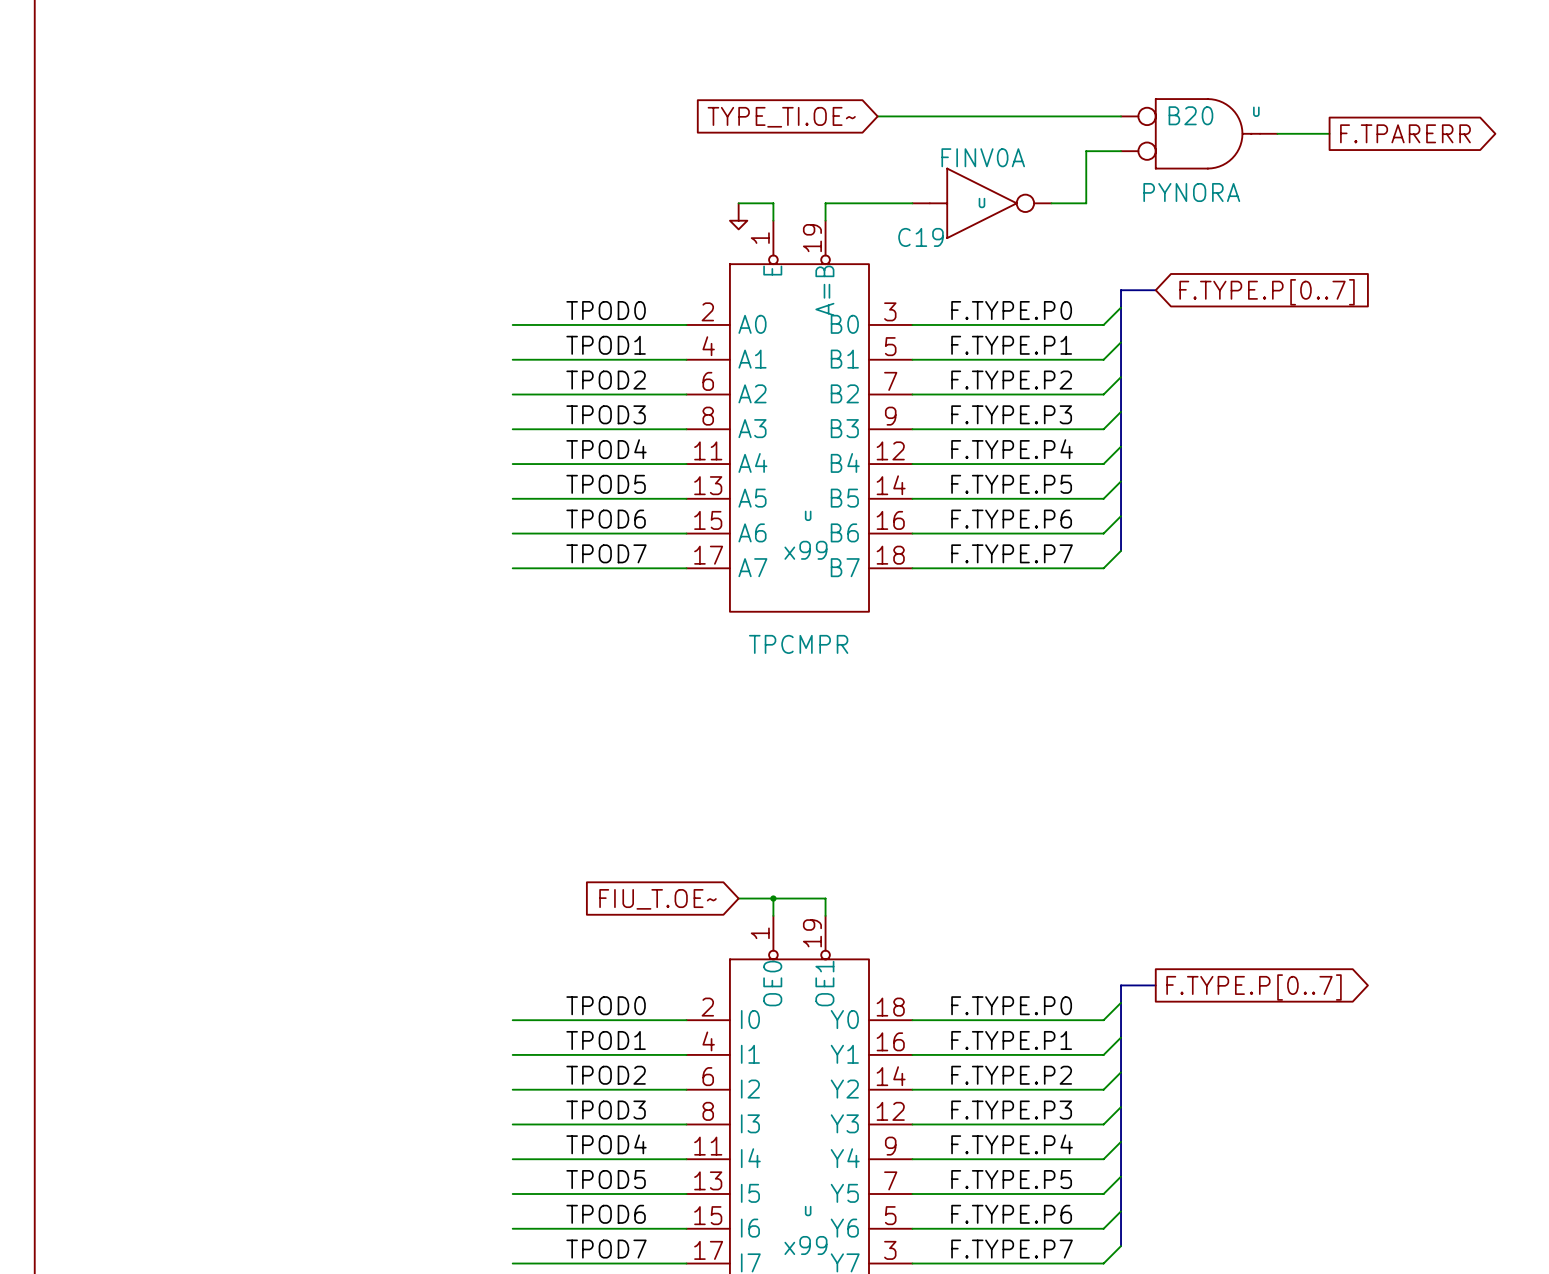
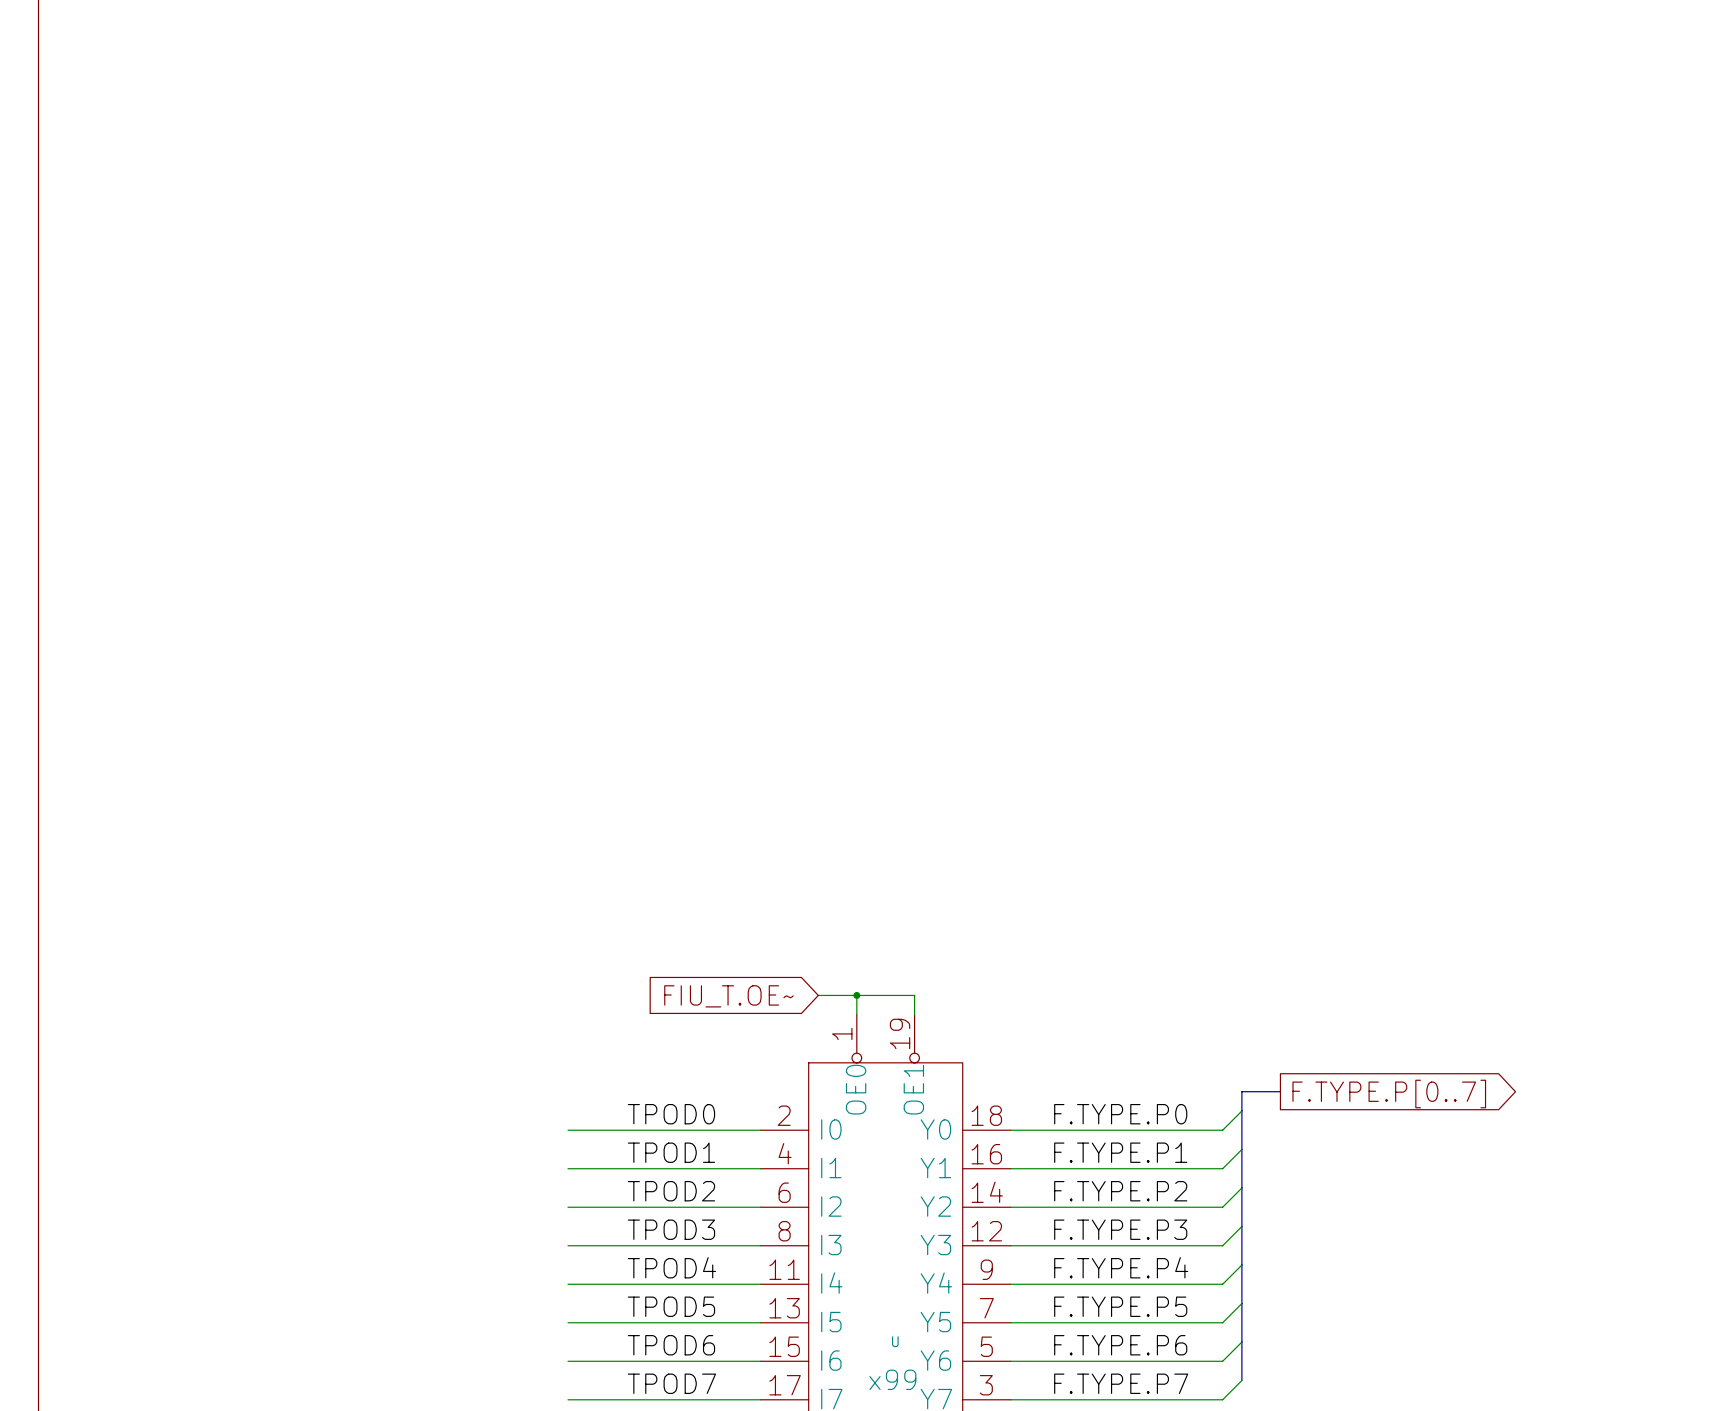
wire: (877, 116) (1121, 116) -> none
global label: TYPE_TI.OE~ (781, 117) -> none
U: (1199, 133) -> none
wire: (1277, 133) (1329, 133) -> none
global label: F.TPARERR (1405, 133) -> none
wire: (1121, 151) (1086, 151) (1086, 203) (1051, 203) -> none
wire: (738, 203) (773, 203) (773, 220) -> none
wire: (912, 203) (825, 203) (825, 220) -> none
U: (981, 203) -> none
power symbol: (738, 216) -> none
bus: (1155, 290) (1121, 290) (1121, 550) -> none
global label: F.TYPE.P[0..7] (1267, 292) -> none
wire: (1121, 307) (1103, 324) (912, 324) -> none
label: TPOD0 (606, 310) -> none
label: F.TYPE.P0 (1011, 310) -> none
wire: (512, 324) (686, 324) -> none
wire: (1121, 342) (1103, 359) (912, 359) -> none
label: TPOD1 (606, 345) -> none
label: F.TYPE.P1 (1011, 345) -> none
wire: (512, 359) (686, 359) -> none
wire: (1121, 377) (1103, 394) (912, 394) -> none
label: TPOD2 (606, 380) -> none
label: F.TYPE.P2 (1011, 380) -> none
wire: (512, 394) (686, 394) -> none
wire: (1121, 411) (1103, 429) (912, 429) -> none
label: TPOD3 (606, 414) -> none
label: F.TYPE.P3 (1011, 414) -> none
U: (799, 416) -> none
wire: (512, 429) (686, 429) -> none
wire: (1121, 446) (1103, 464) (912, 464) -> none
label: TPOD4 (606, 449) -> none
label: F.TYPE.P4 (1012, 449) -> none
wire: (512, 464) (686, 464) -> none
wire: (1121, 481) (1103, 498) (912, 498) -> none
label: TPOD5 (606, 484) -> none
label: F.TYPE.P5 (1011, 484) -> none
wire: (512, 498) (686, 498) -> none
wire: (1121, 516) (1103, 533) (912, 533) -> none
label: TPOD6 (606, 519) -> none
label: F.TYPE.P6 (1011, 519) -> none
wire: (512, 533) (686, 533) -> none
wire: (1121, 550) (1103, 568) (912, 568) -> none
label: TPOD7 (606, 553) -> none
label: F.TYPE.P7 (1012, 553) -> none
wire: (512, 568) (686, 568) -> none

